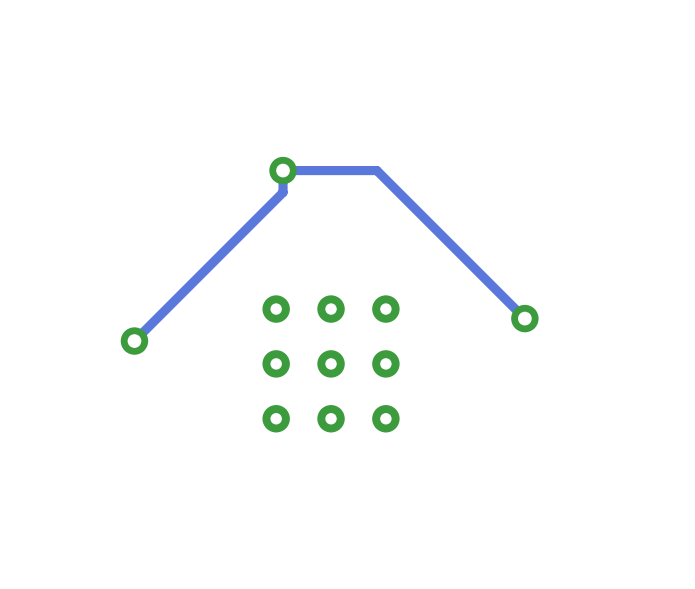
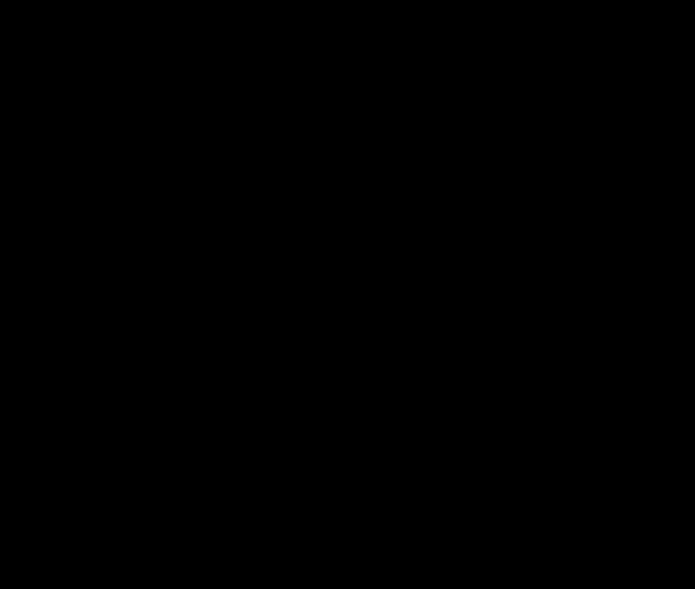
via: (283, 170) -> none
track: (524, 318) (376, 170) (283, 170) (283, 192) (134, 341) -> none
via: (524, 318) -> none
via: (134, 341) -> none
part: (331, 363) -> none

